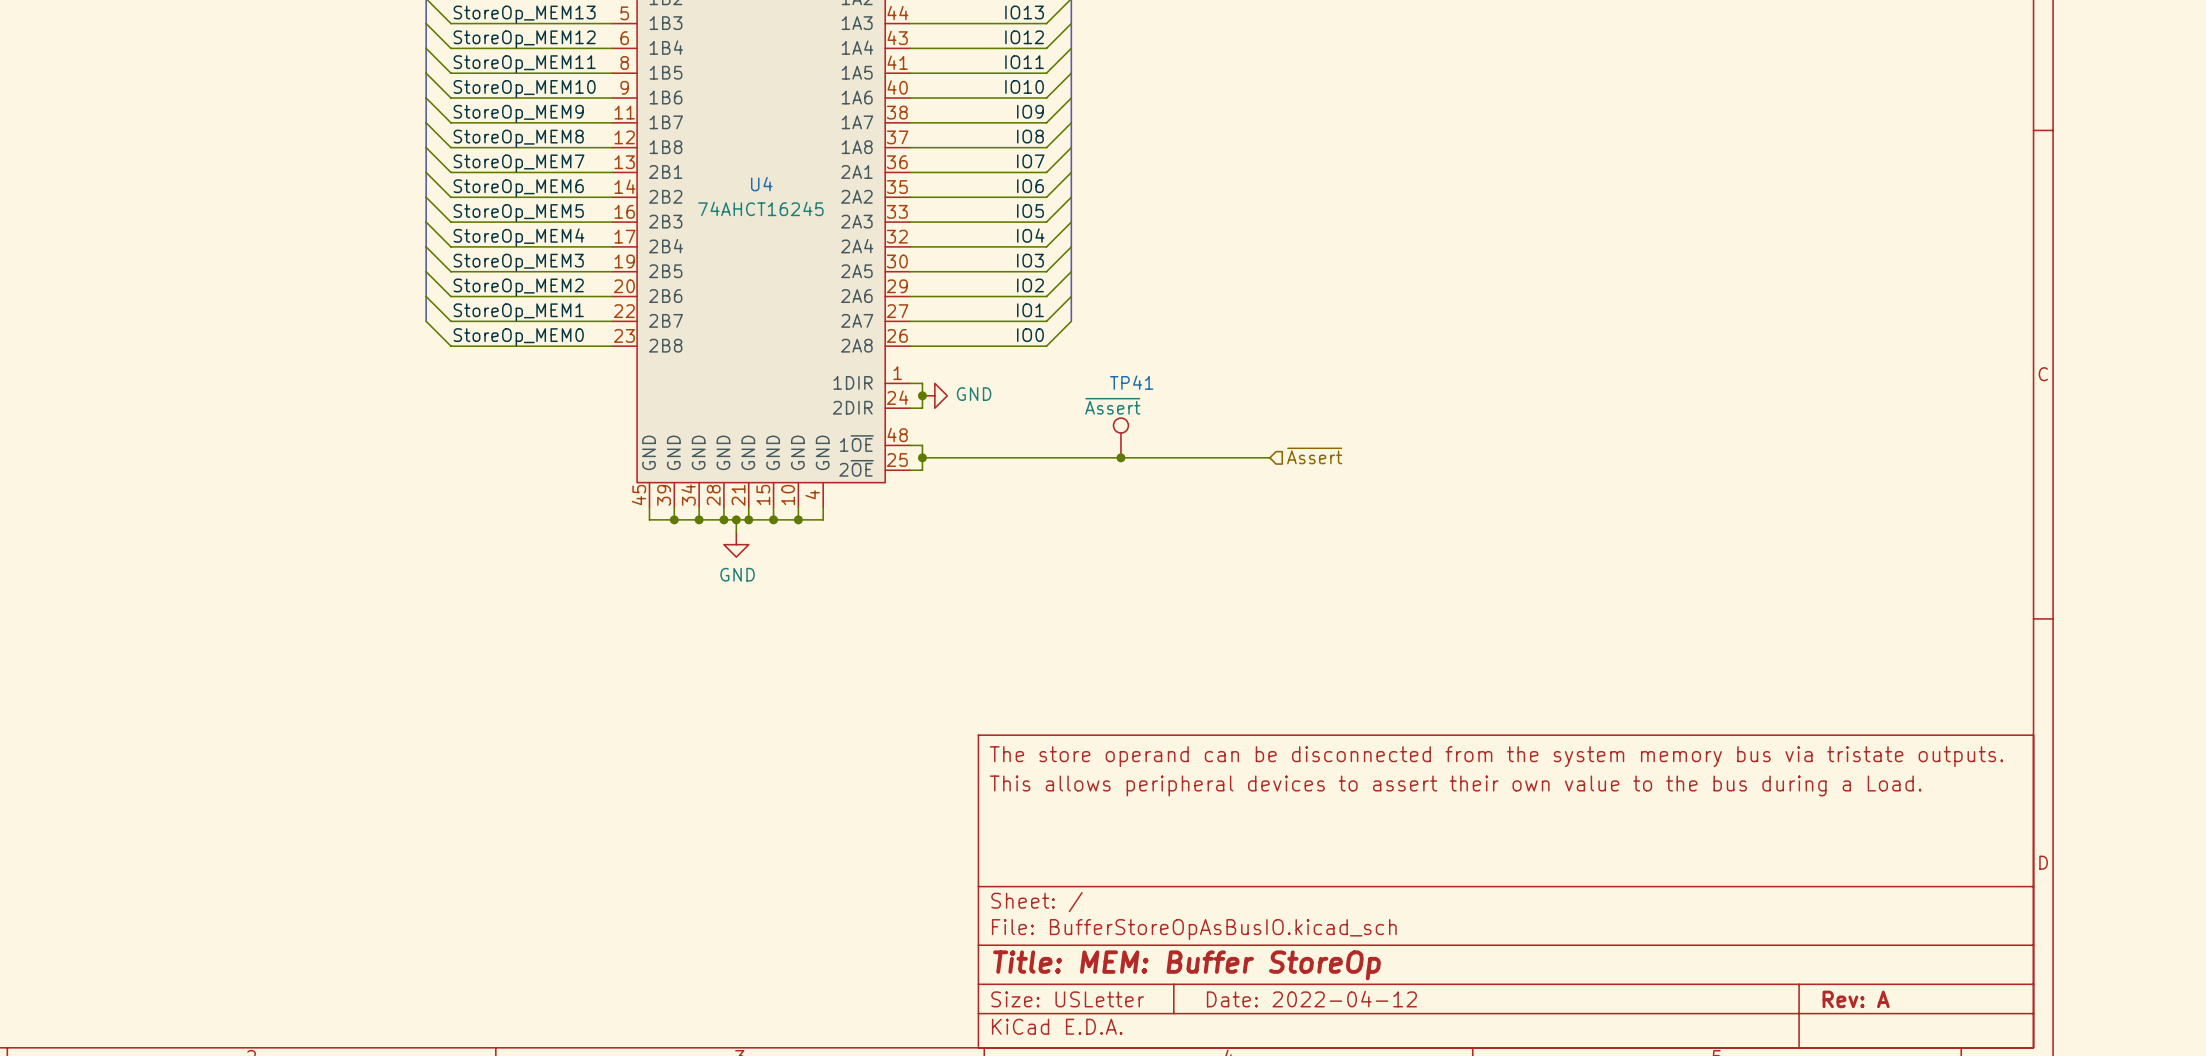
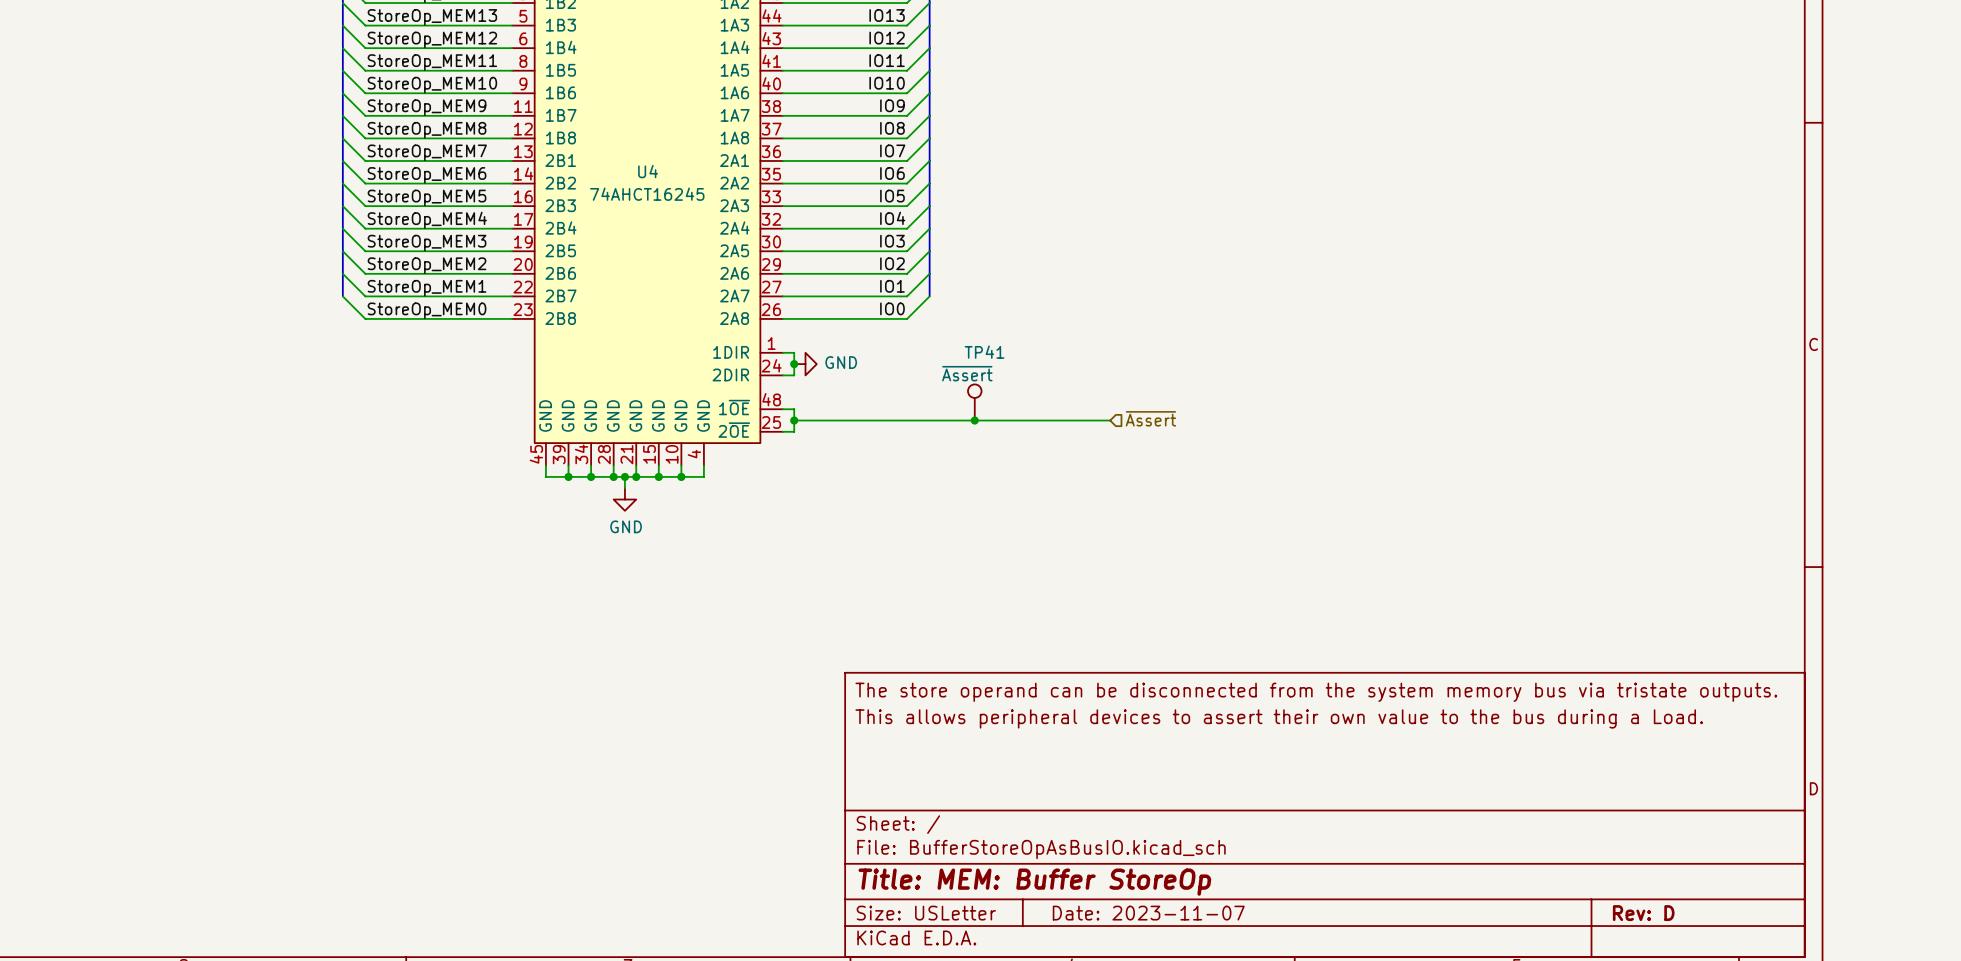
title block: Date: 2022-04-12 (1311, 999) -> Date: 2023-11-07 (1148, 913)
title block: Rev: A (1856, 999) -> Rev: D (1643, 913)

